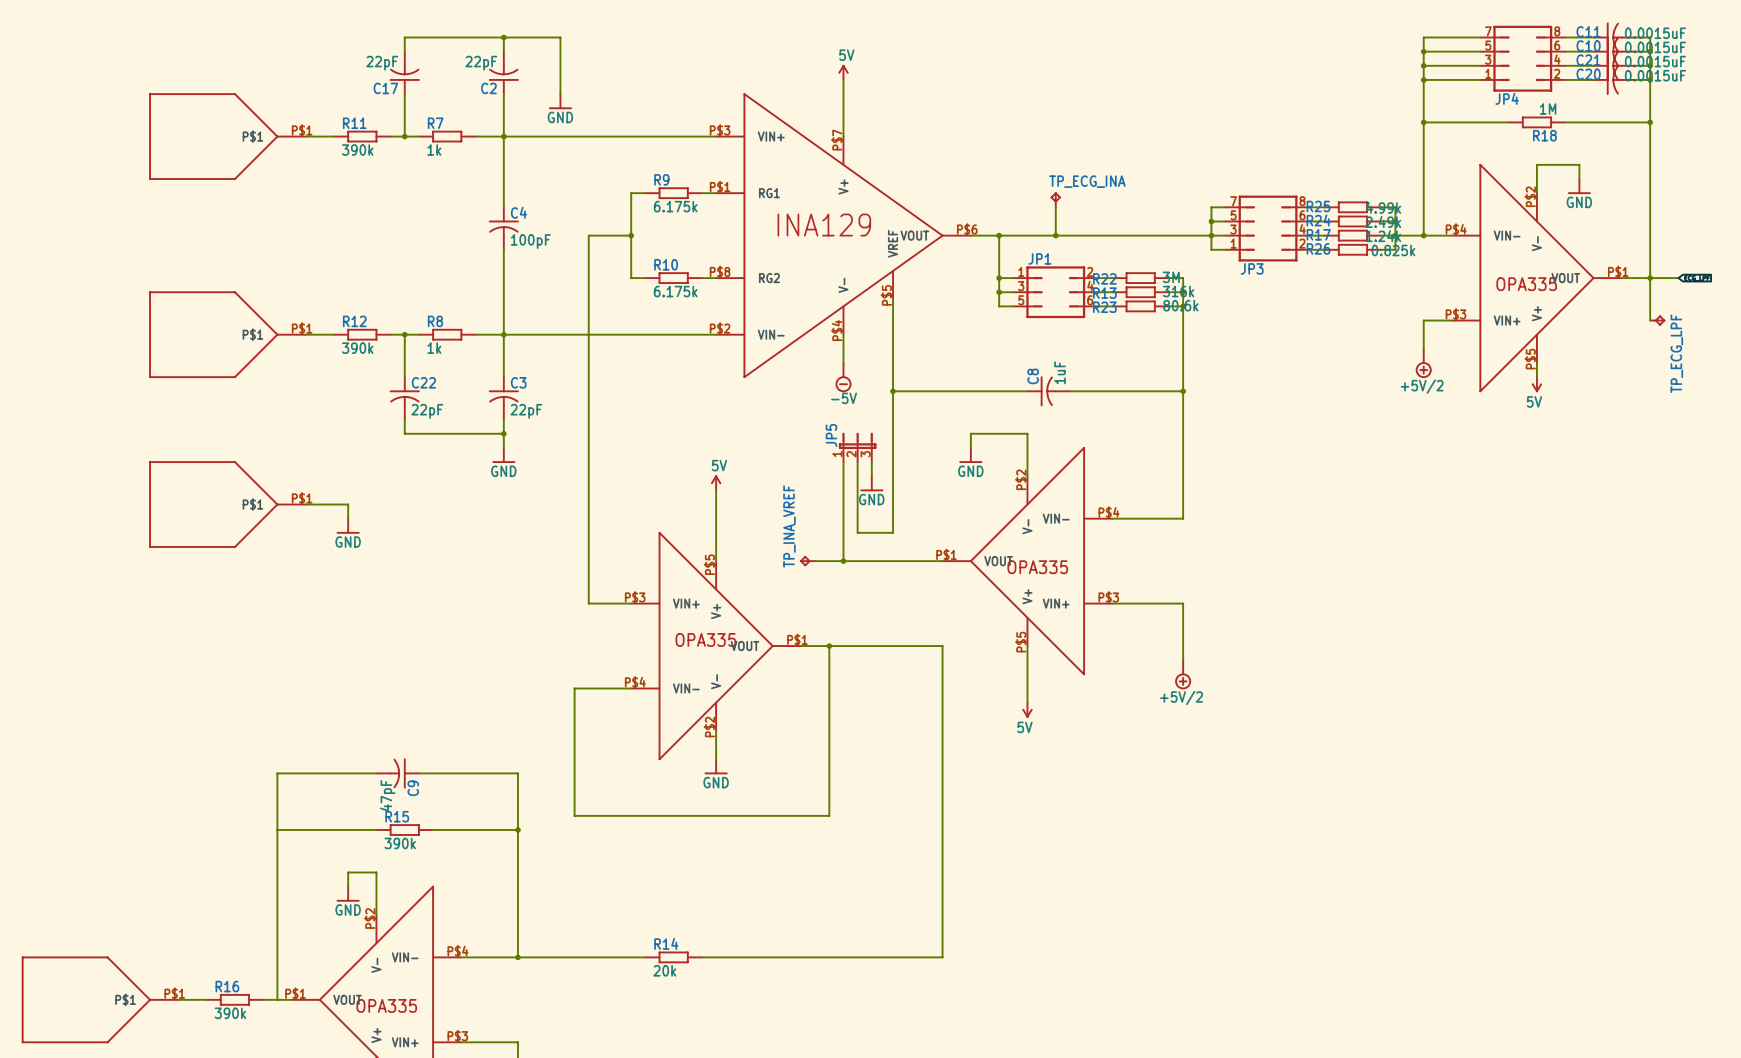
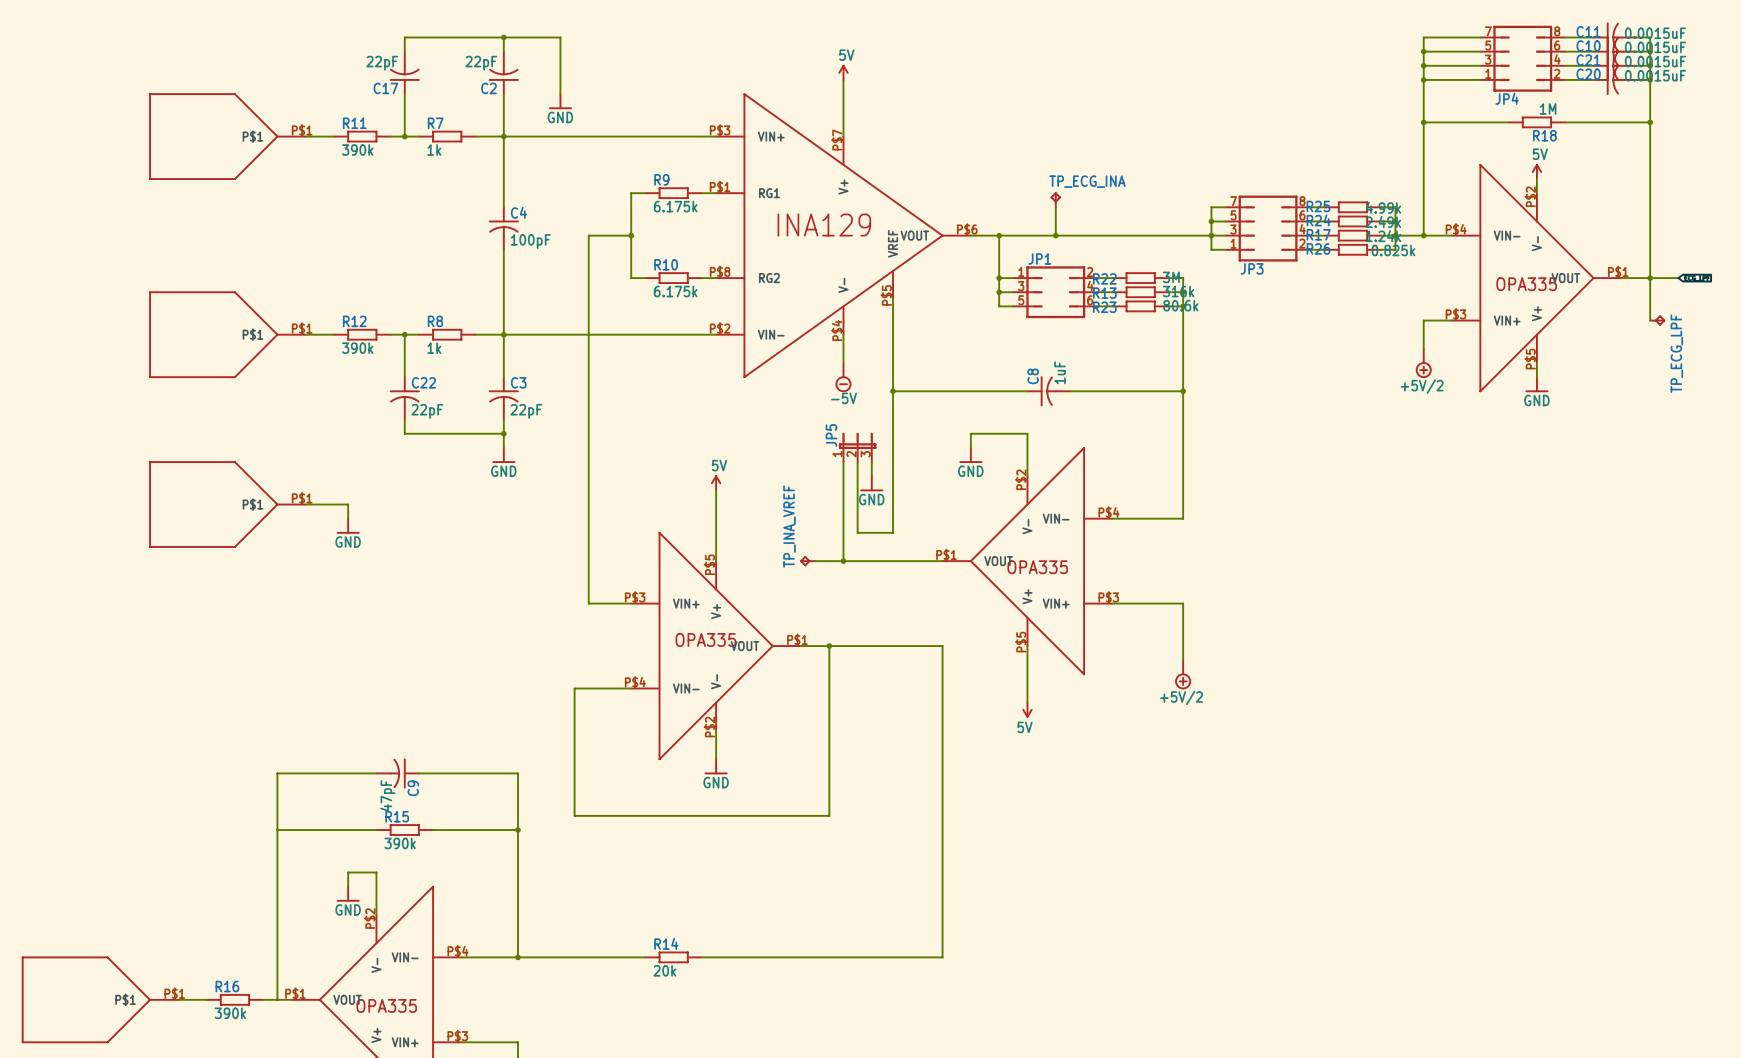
power symbol: none -> 5V (1536, 171)
wire: (1536, 179) (1536, 164) (1579, 164) (1579, 179) -> none
power symbol: GND (1579, 186) -> none
power symbol: 5V (1536, 384) -> GND (1536, 384)

